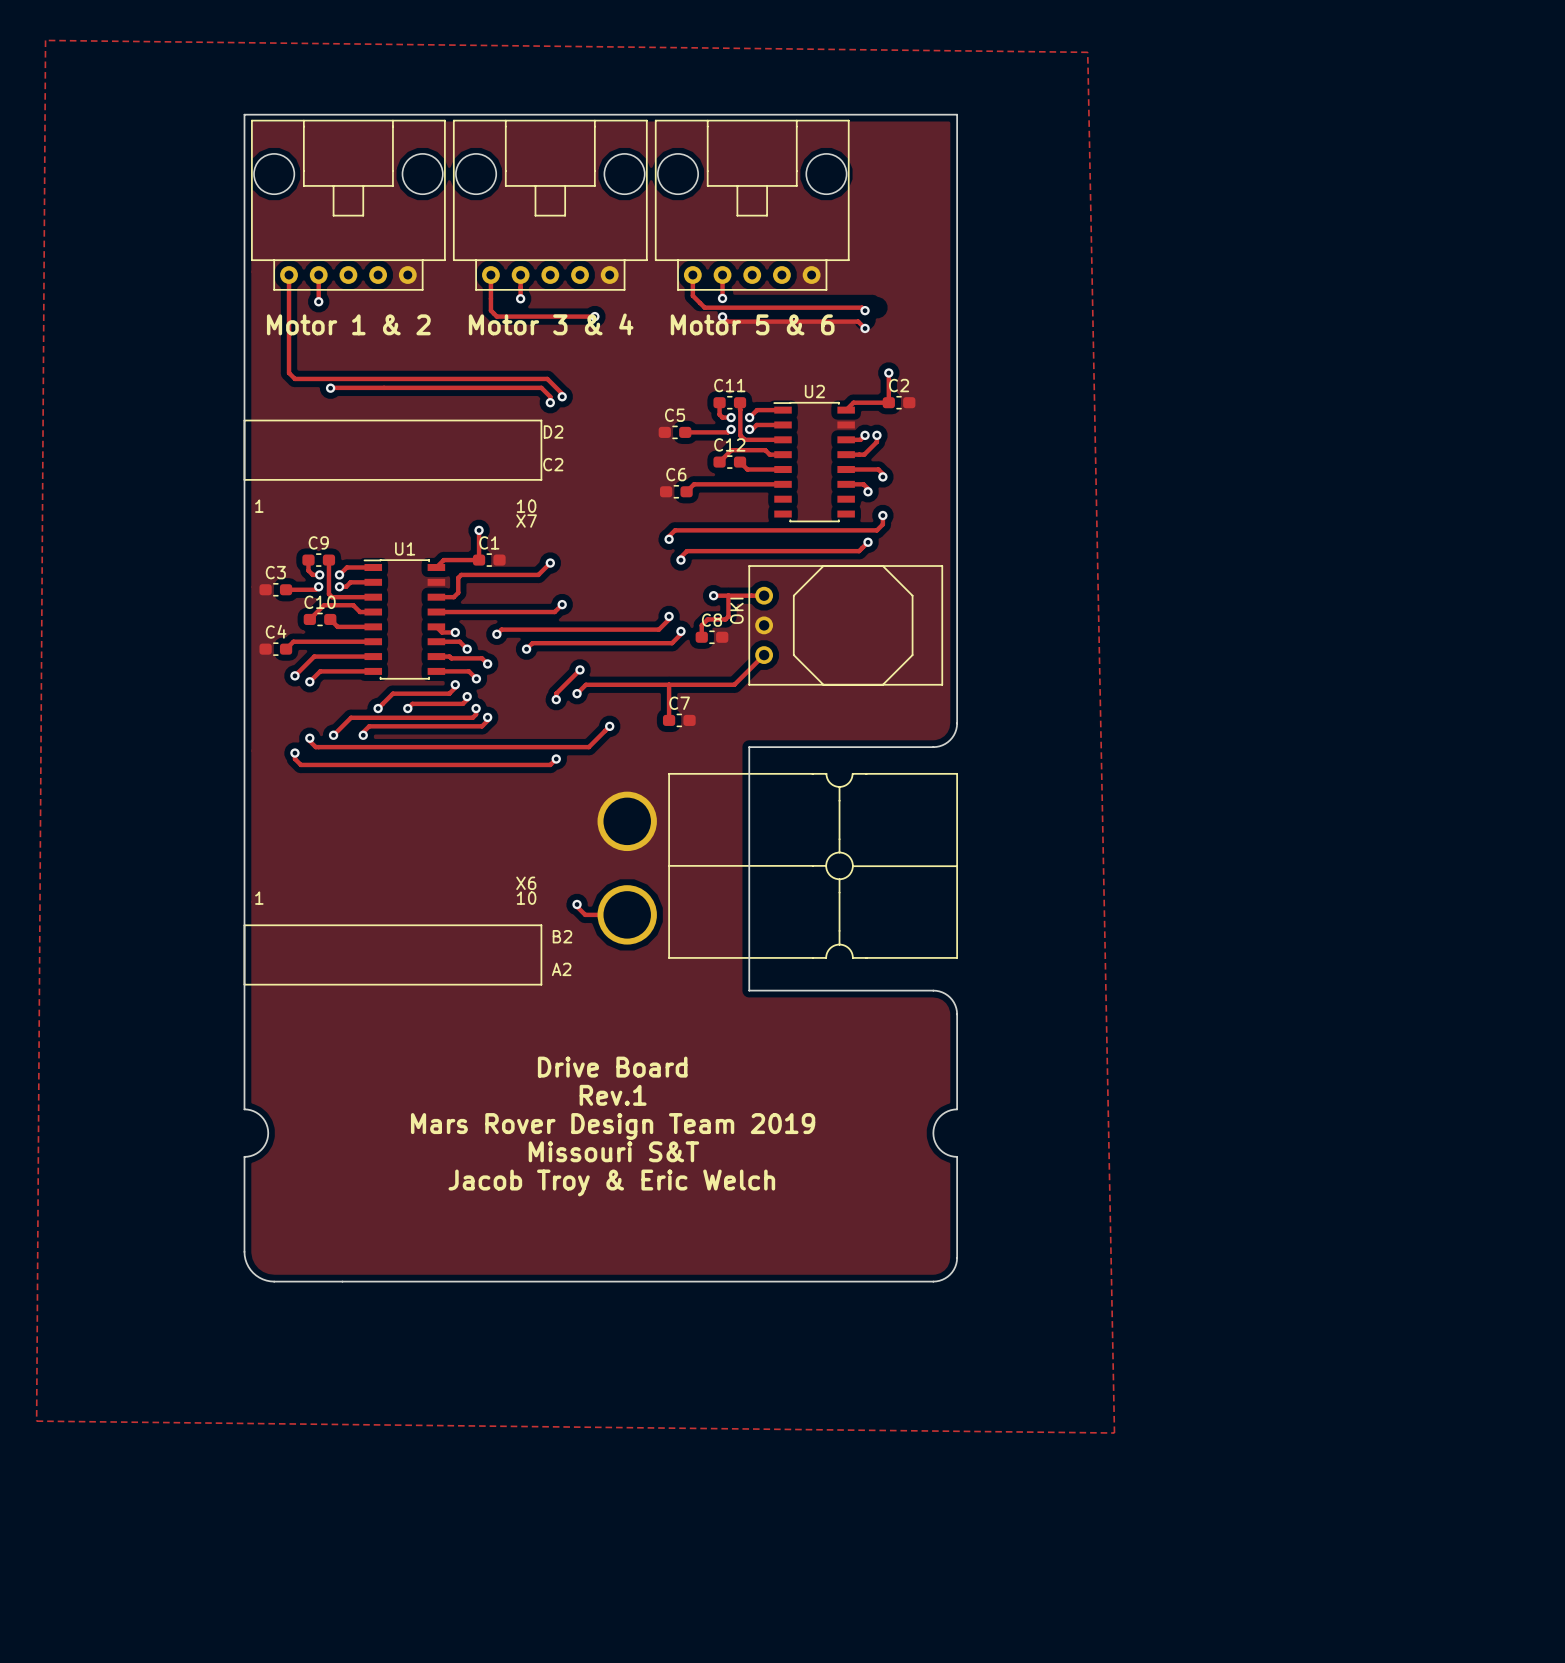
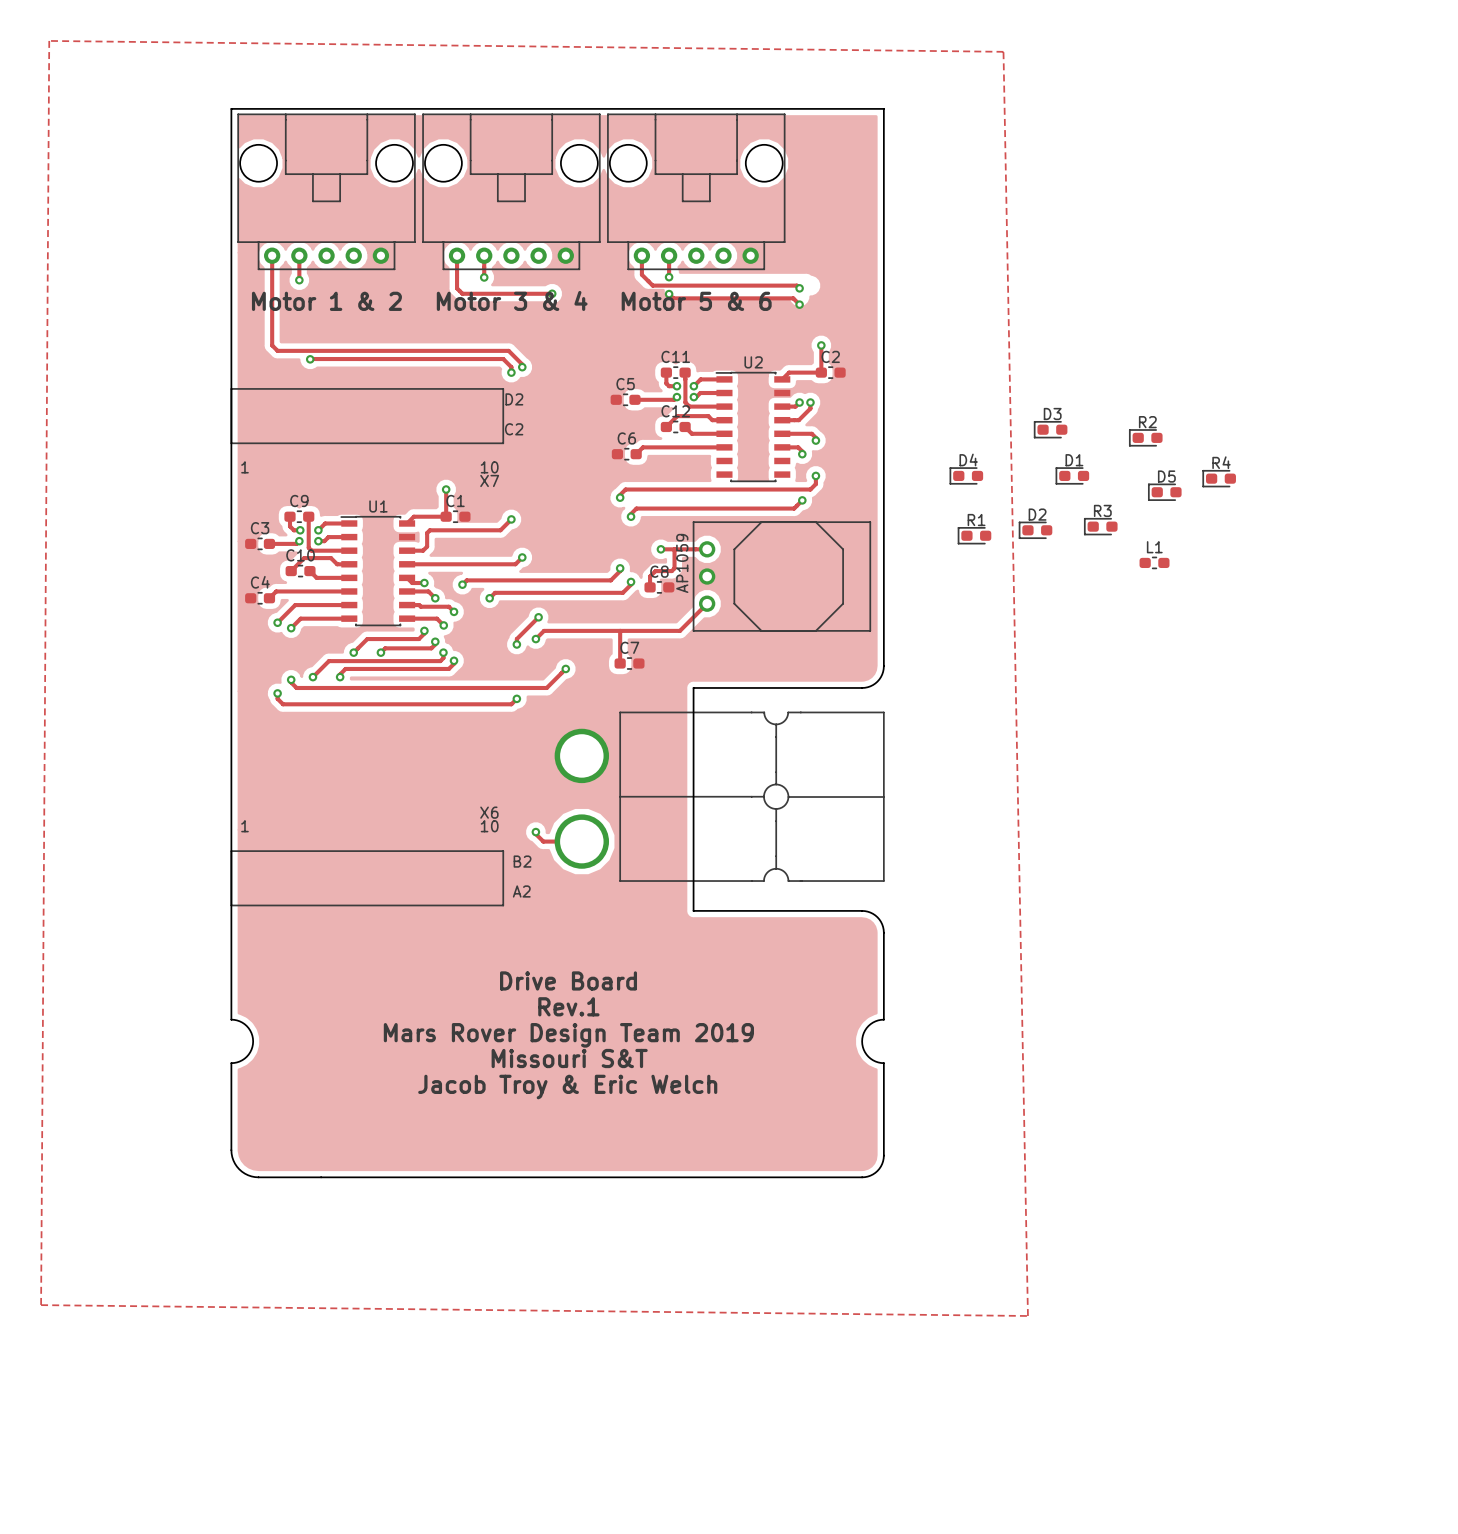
D3: none -> (1050, 429)
R2: none -> (1145, 437)
D4: none -> (966, 475)
D1: none -> (1072, 475)
R4: none -> (1219, 478)
D5: none -> (1164, 492)
R3: none -> (1100, 526)
D2: none -> (1035, 530)
R1: none -> (974, 535)
part value: OKI (736, 610) -> AP1059 (682, 563)
L1: none -> (1154, 562)

